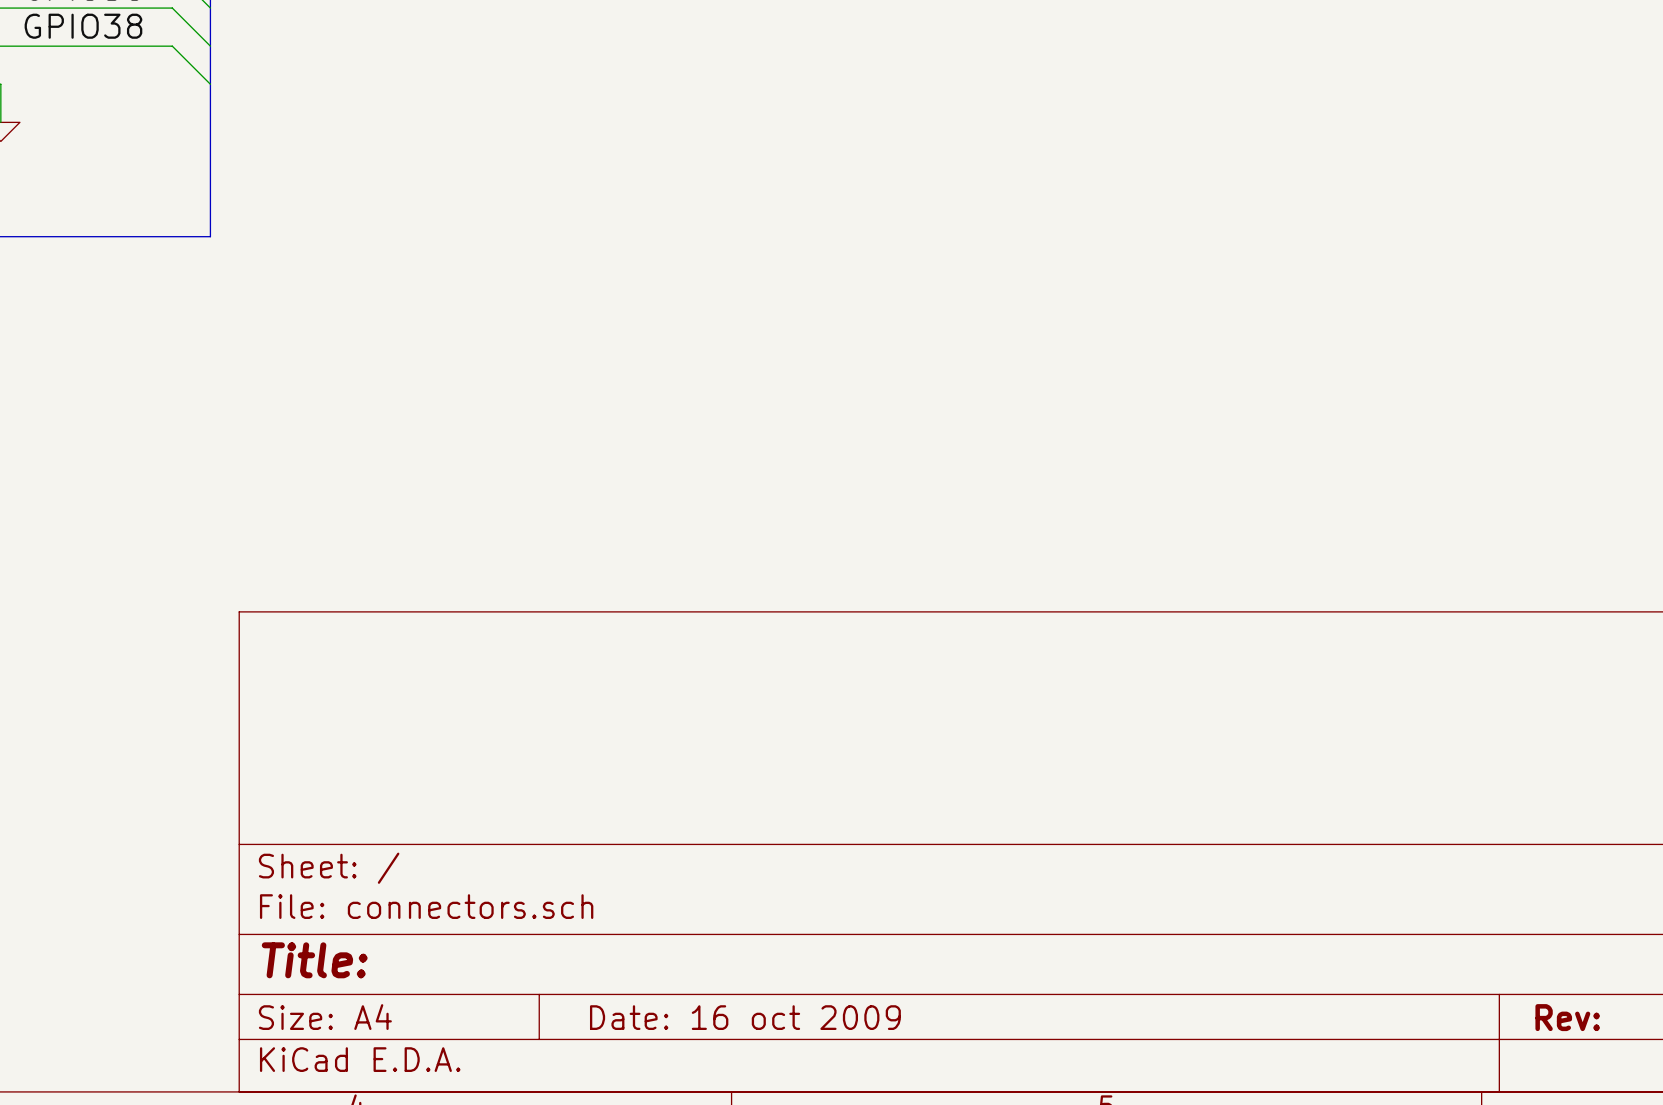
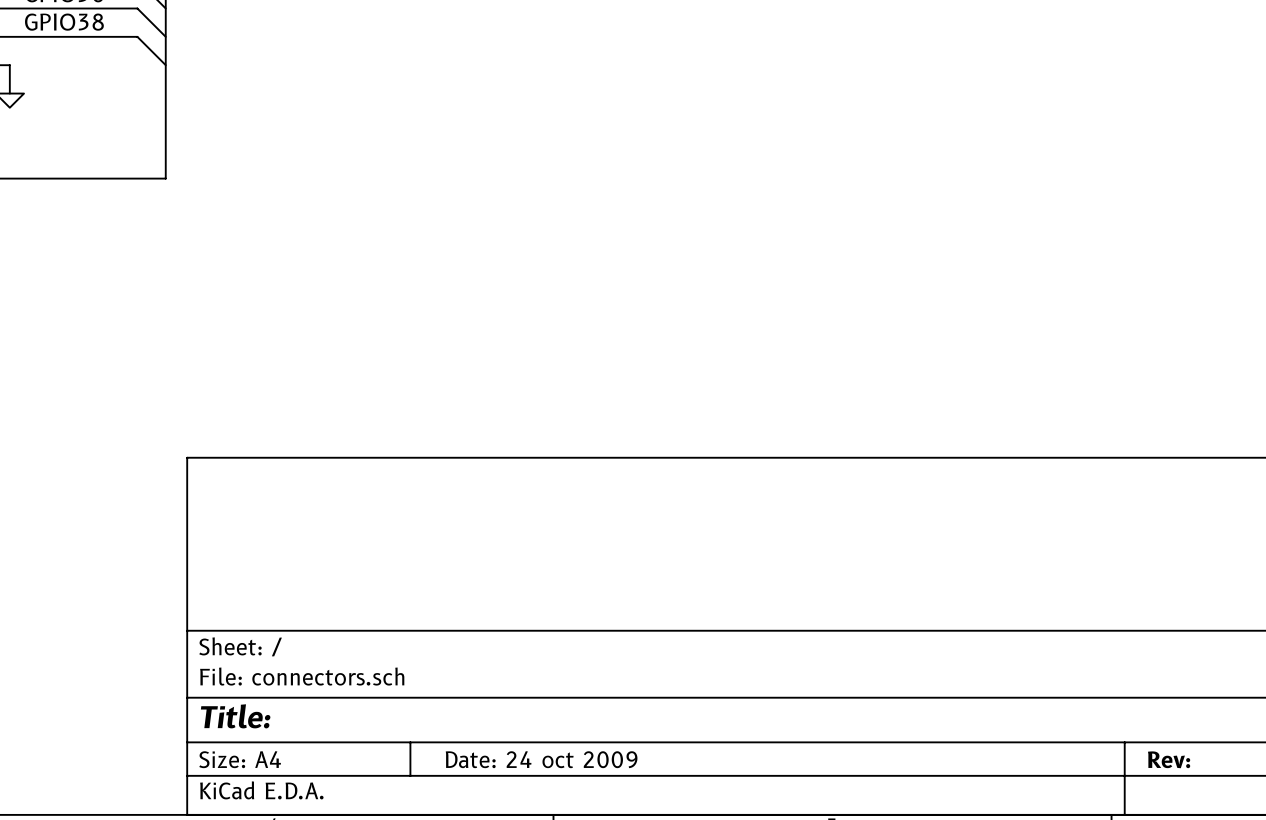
title block: Date: 16 oct 2009 (745, 1017) -> Date: 24 oct 2009 (541, 759)

